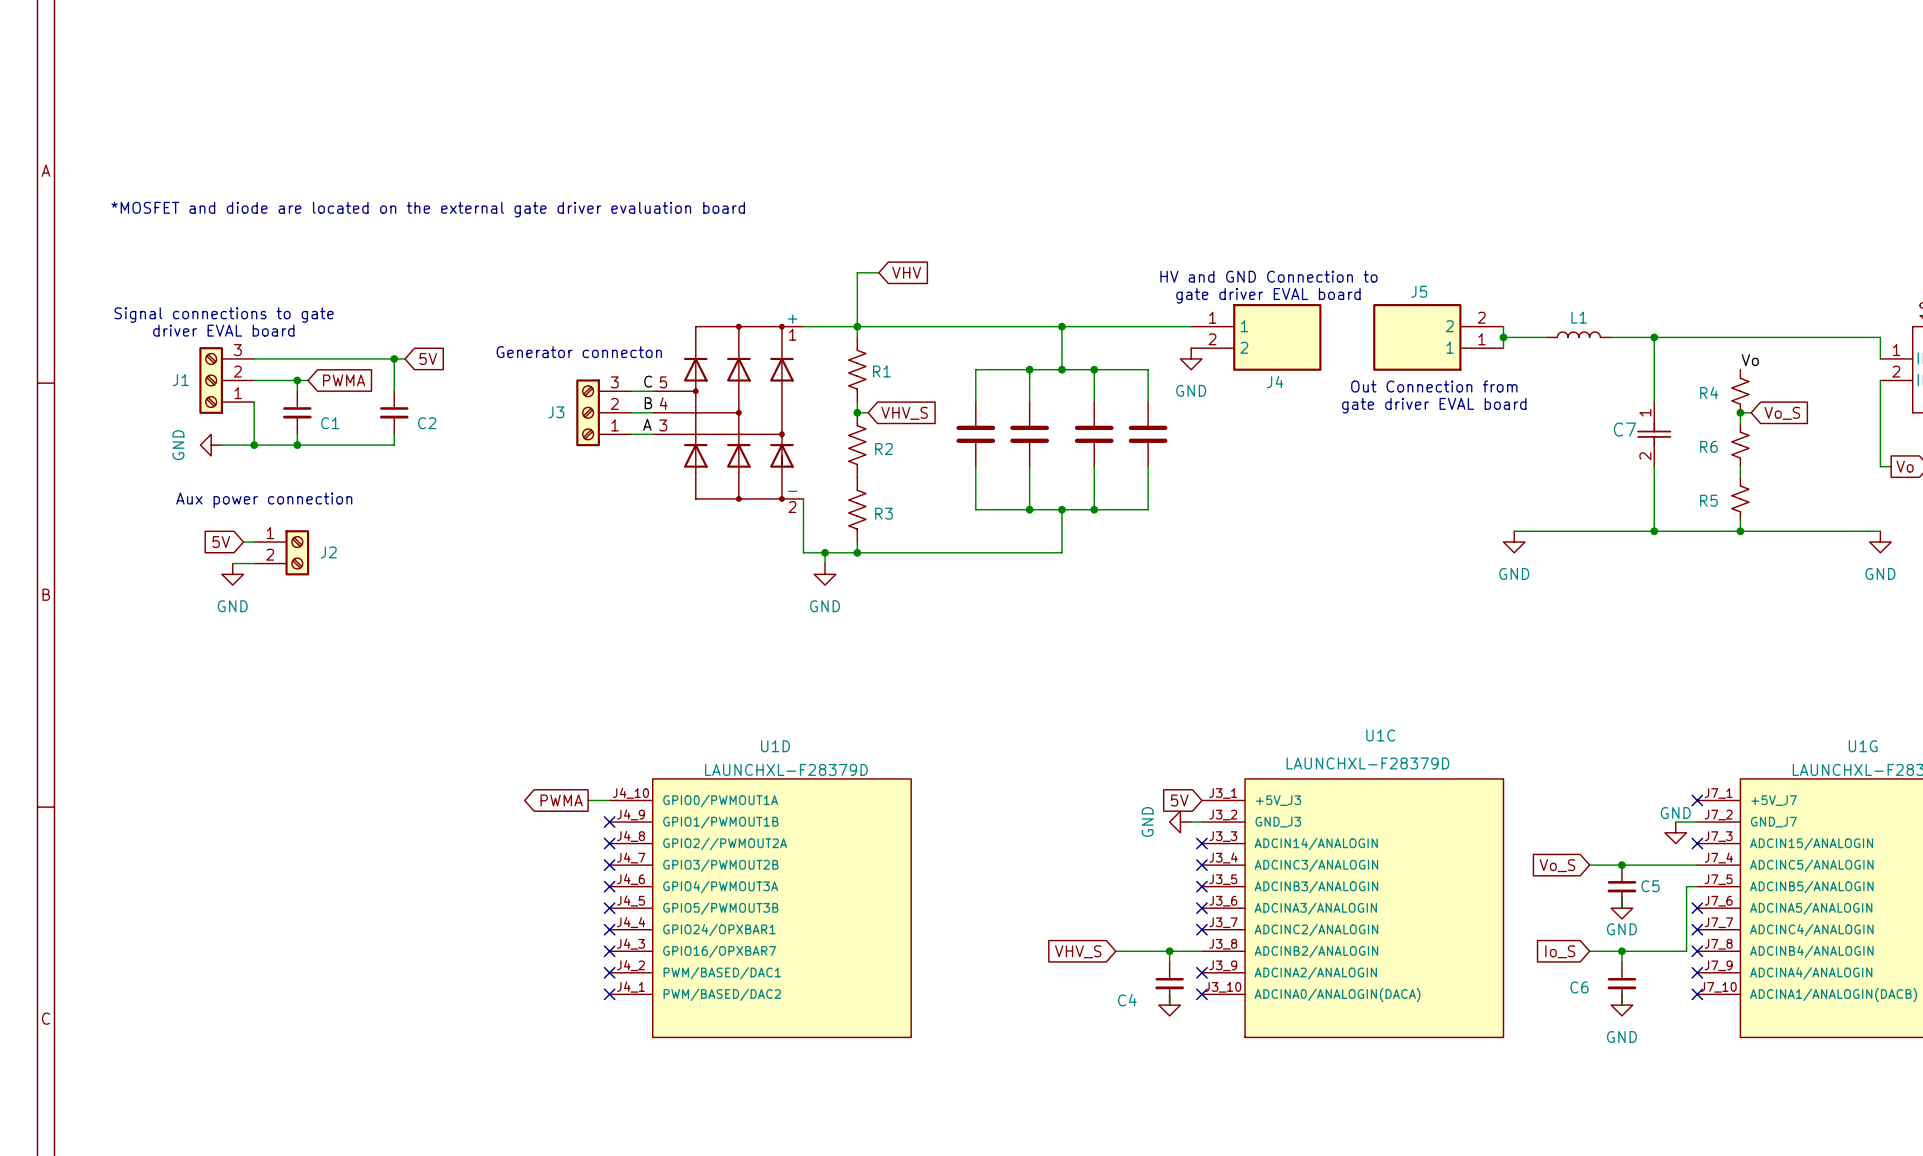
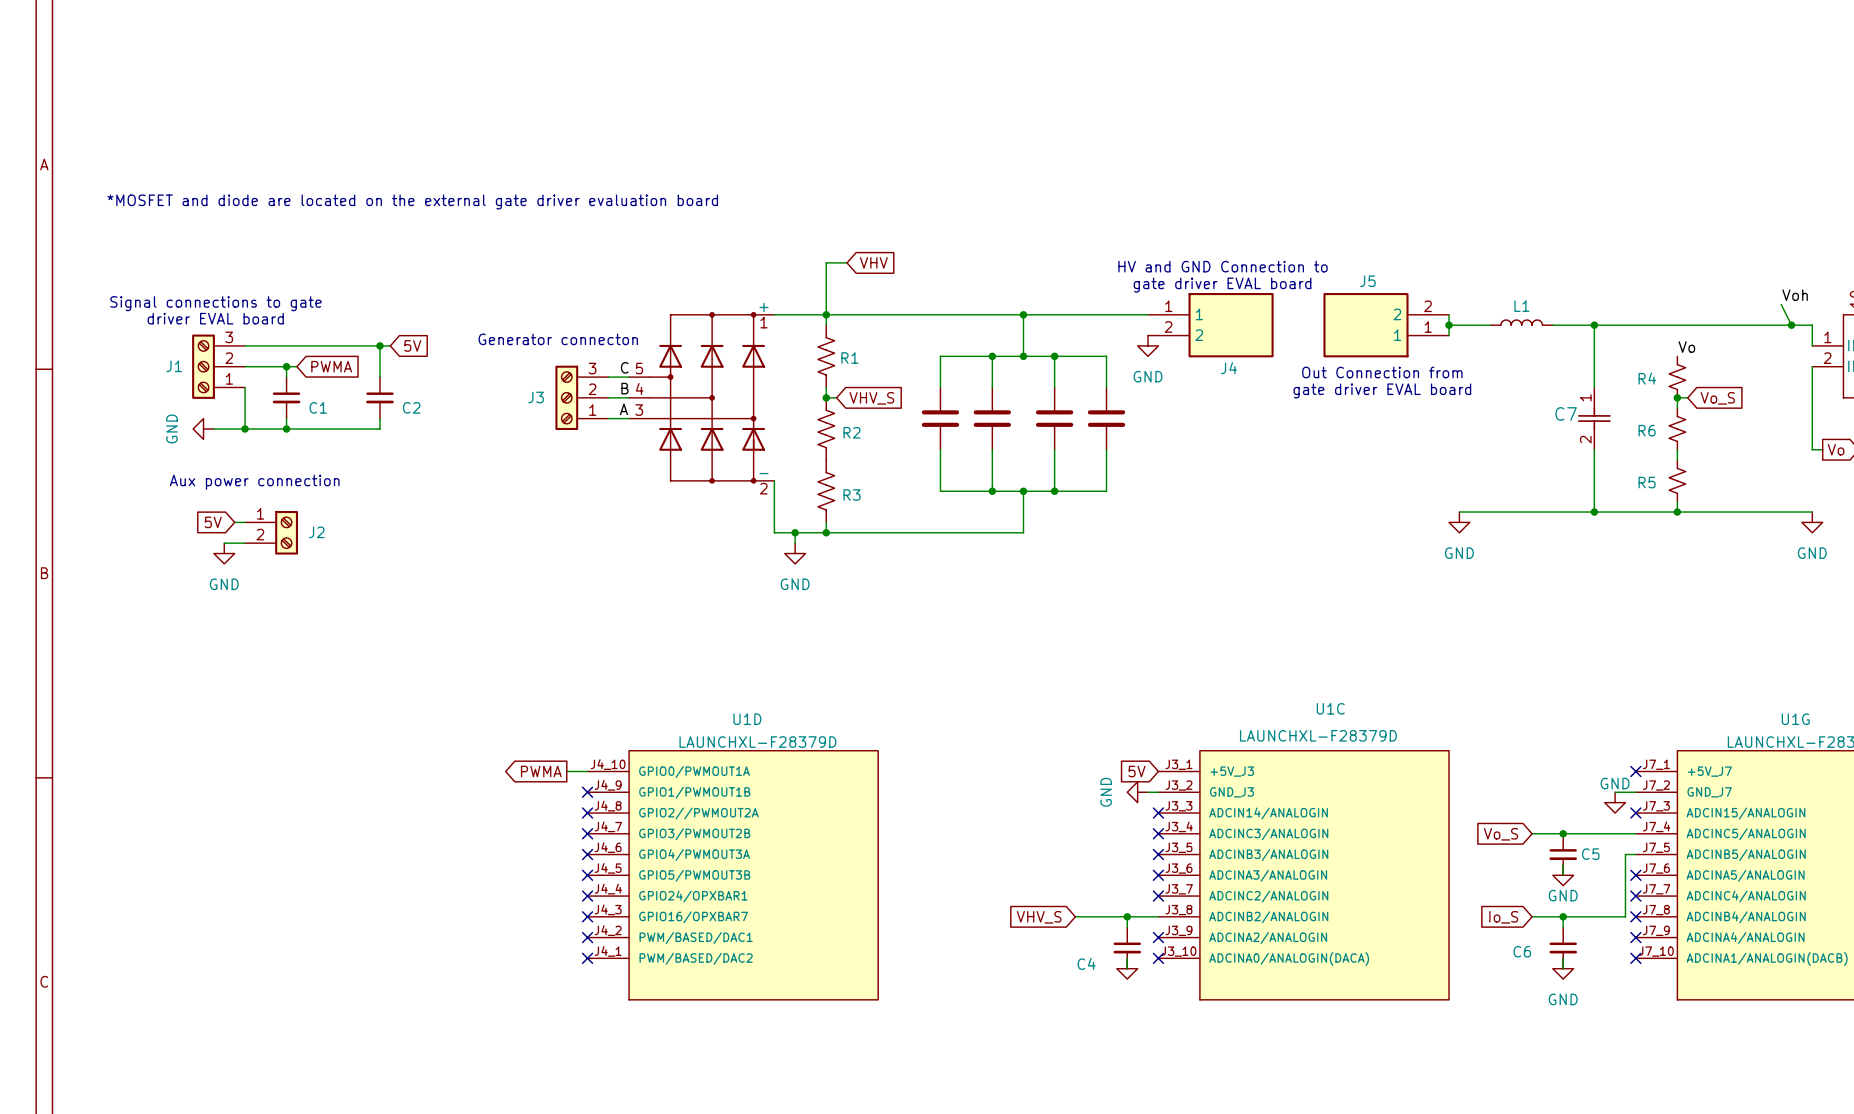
label: none -> Voh (1795, 295)
wire: none -> (1781, 304) (1791, 325)
junction: none -> (1791, 325)

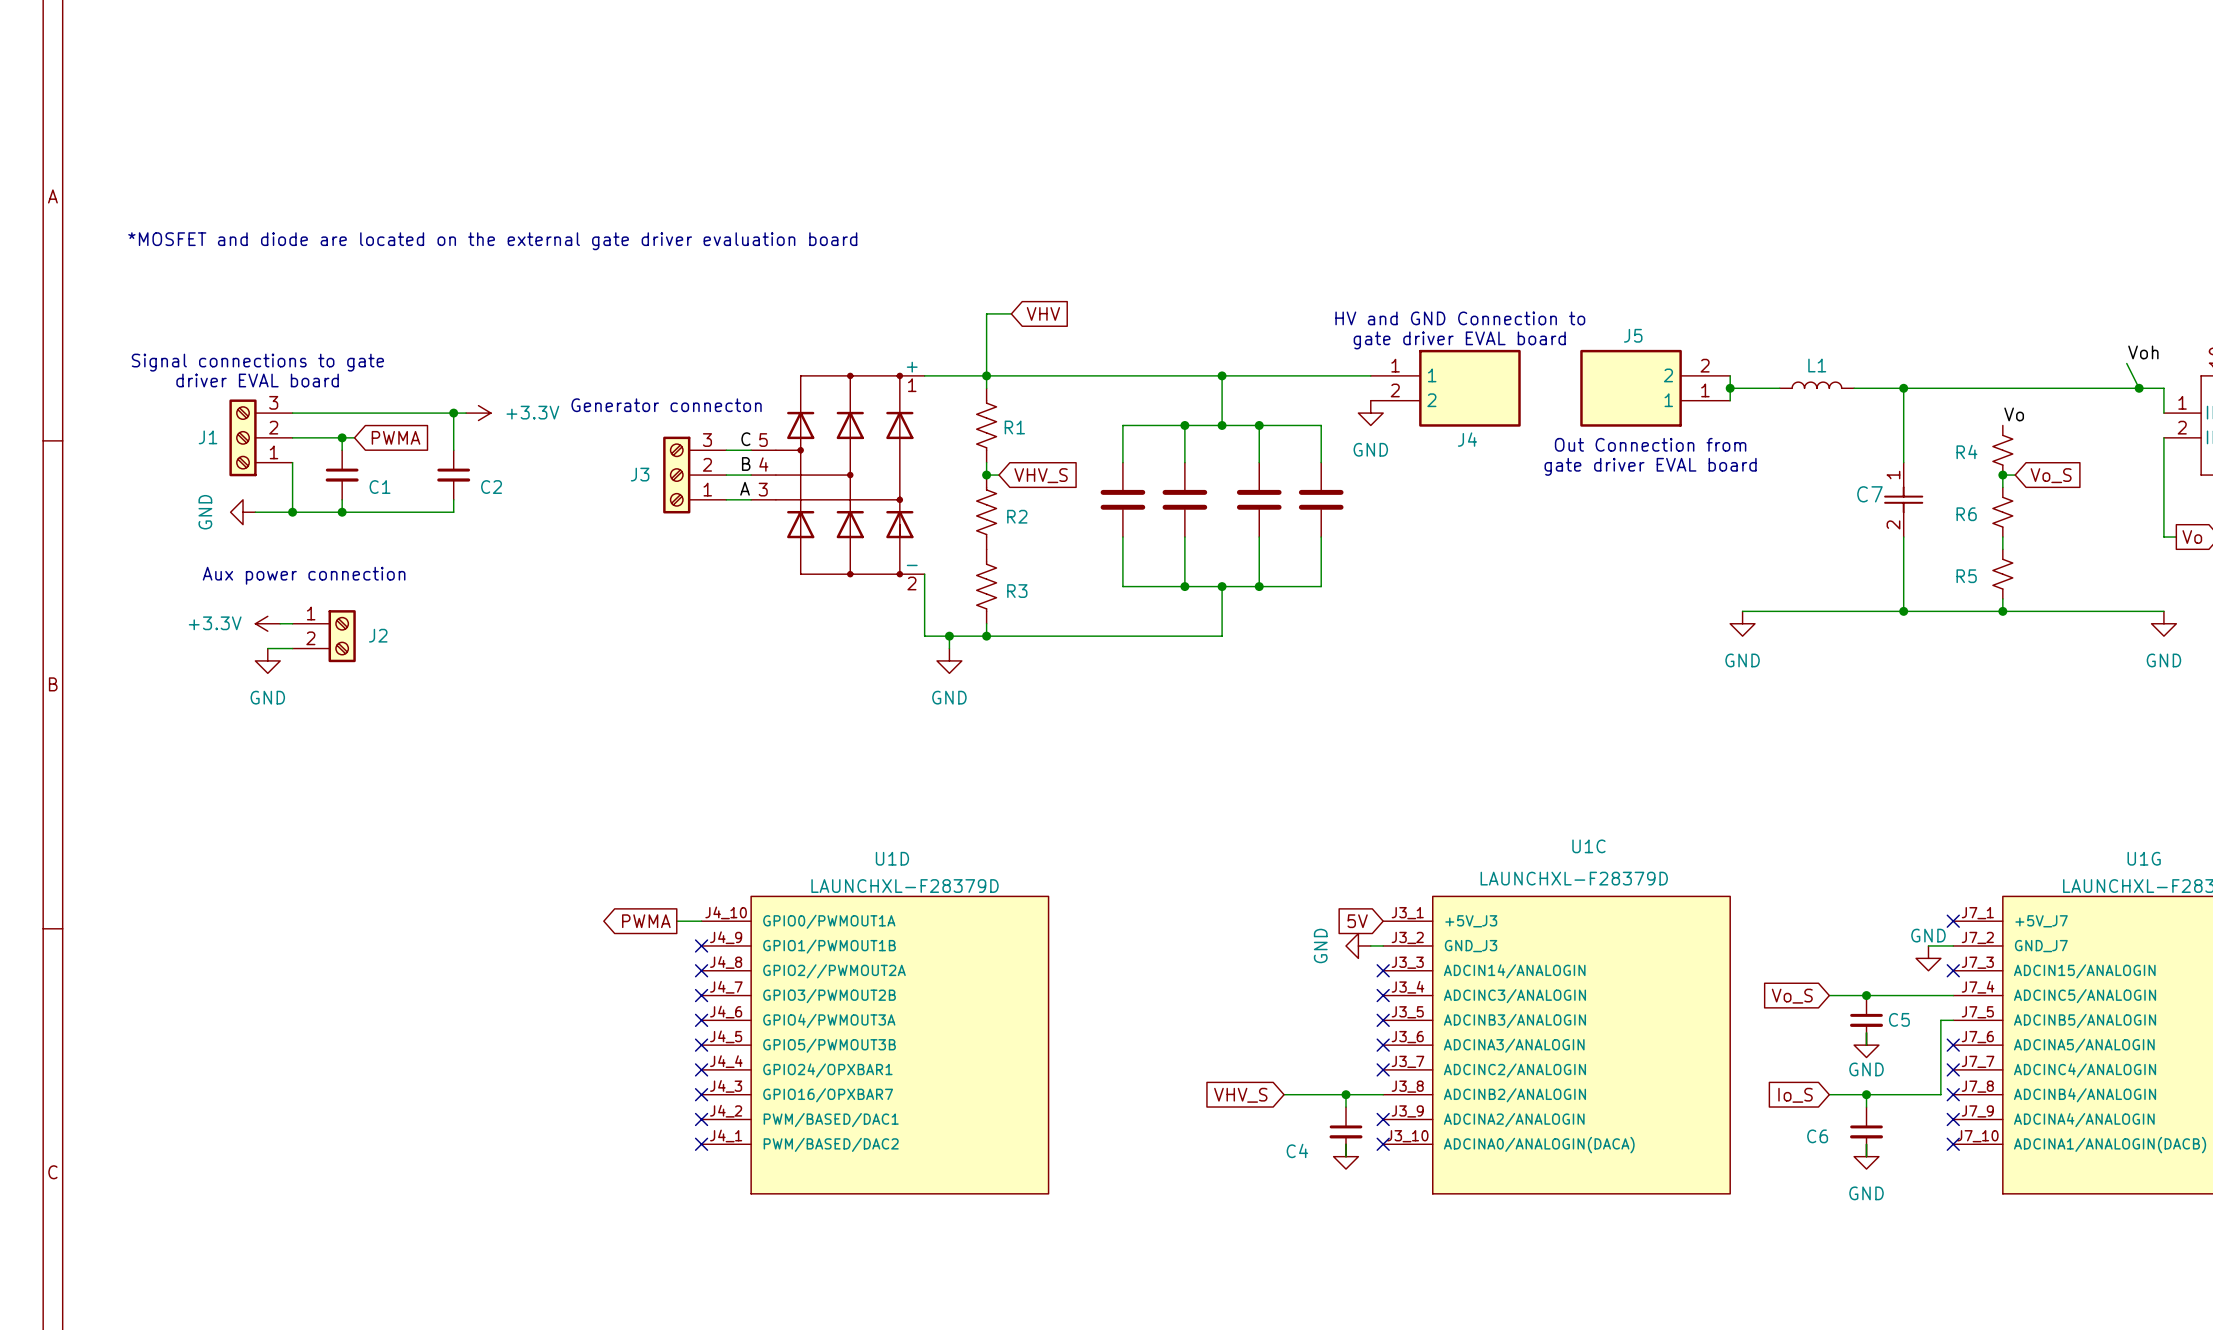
power symbol: none -> +3.3V (478, 413)
global label: 5V (412, 345) -> none
global label: 5V (213, 522) -> none
power symbol: none -> +3.3V (267, 623)

